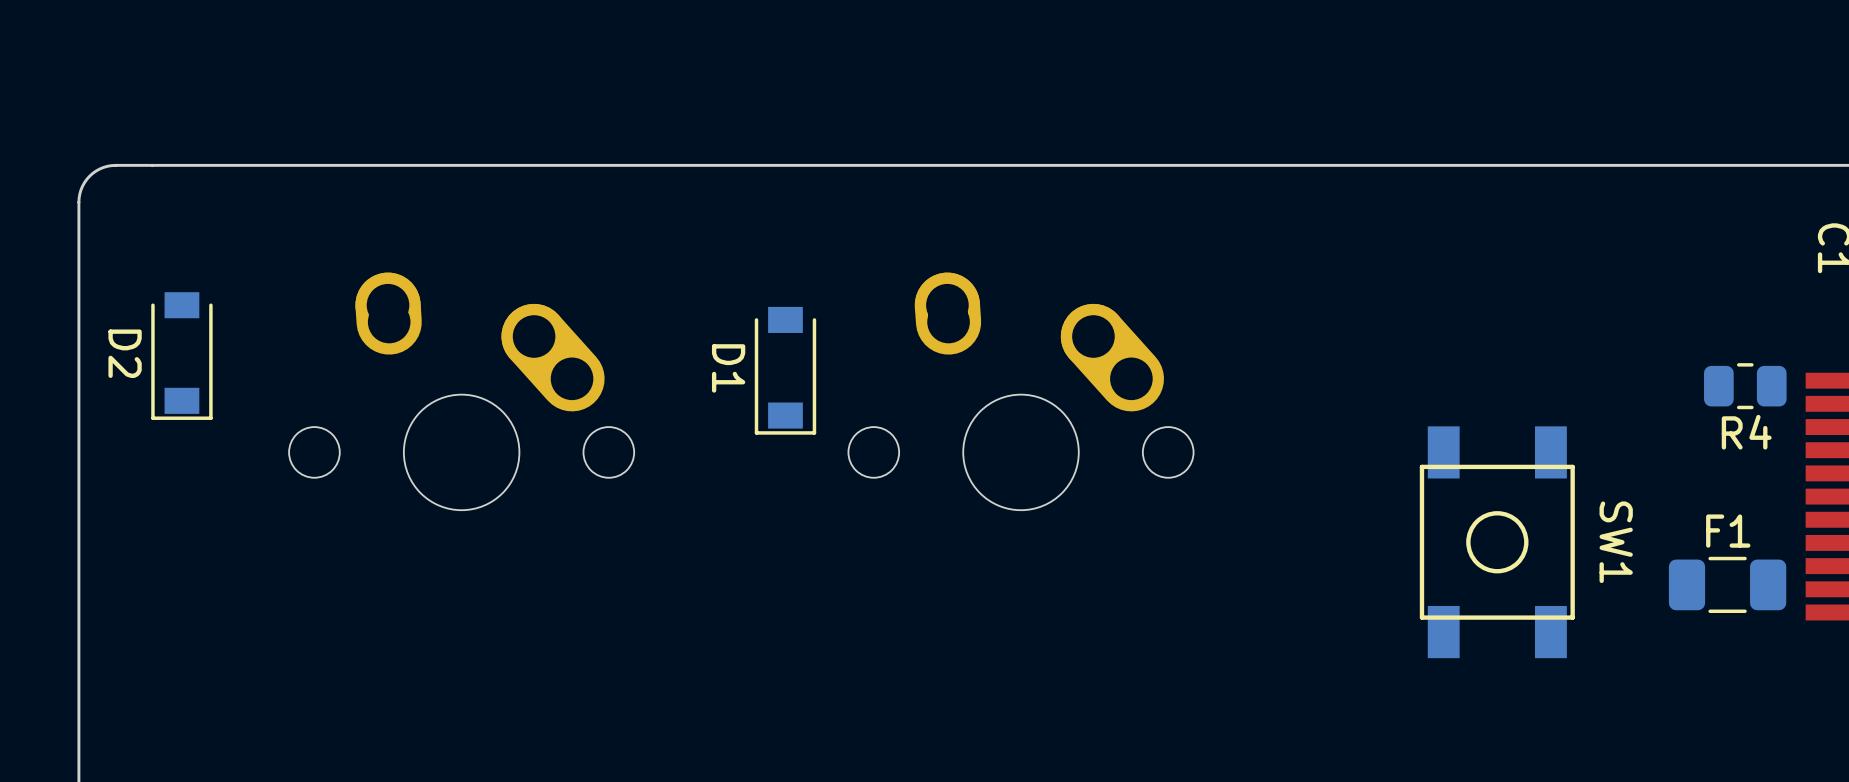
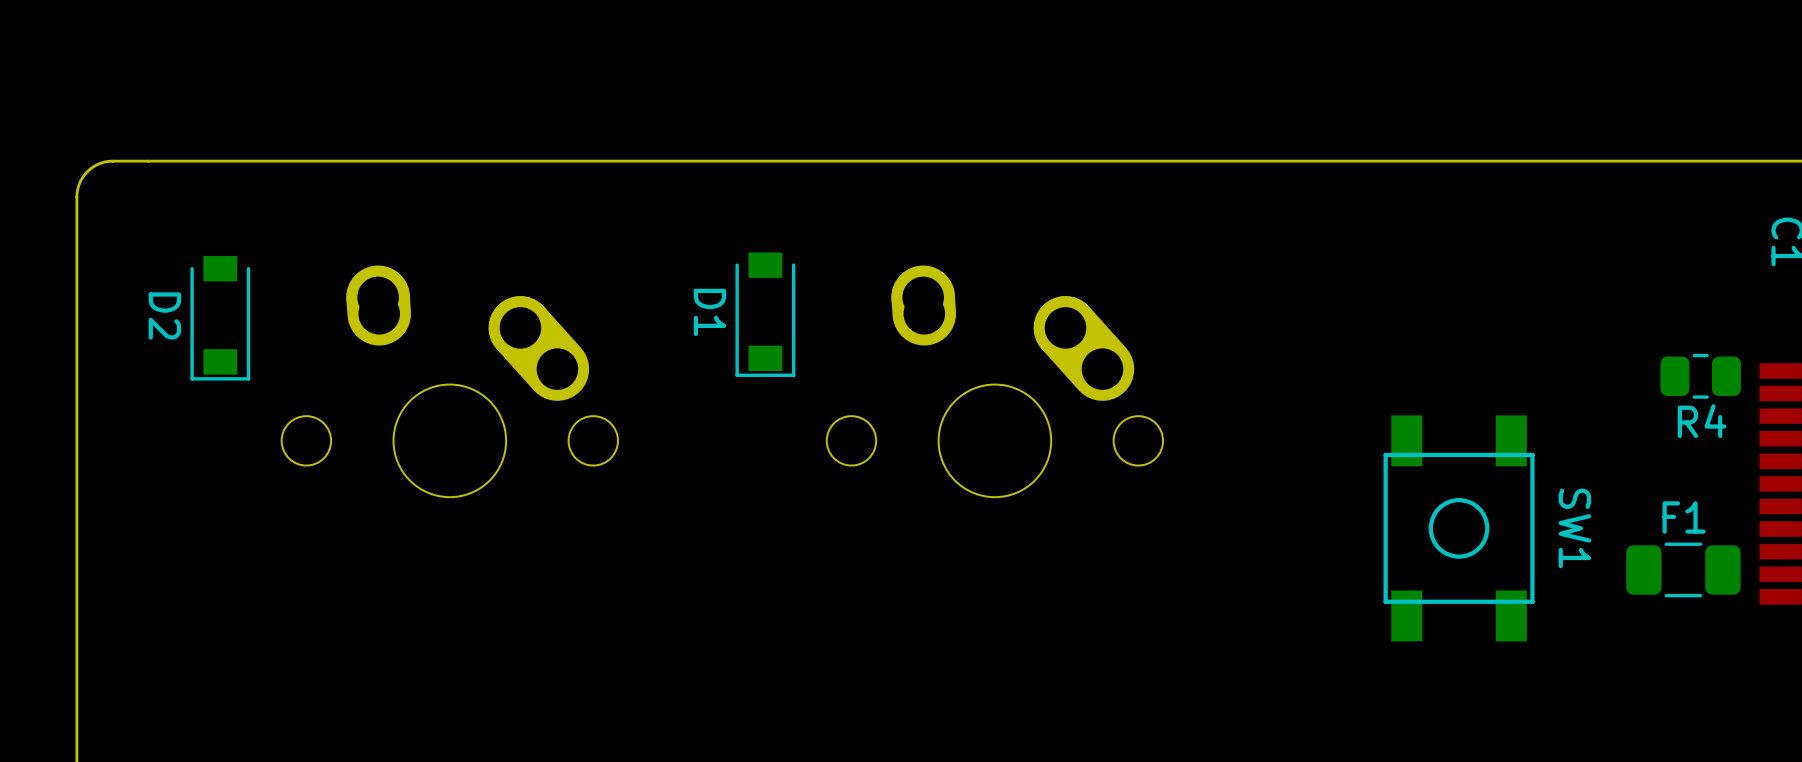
D2 position: (181, 356) -> (220, 318)
D1 position: (785, 370) -> (765, 314)

